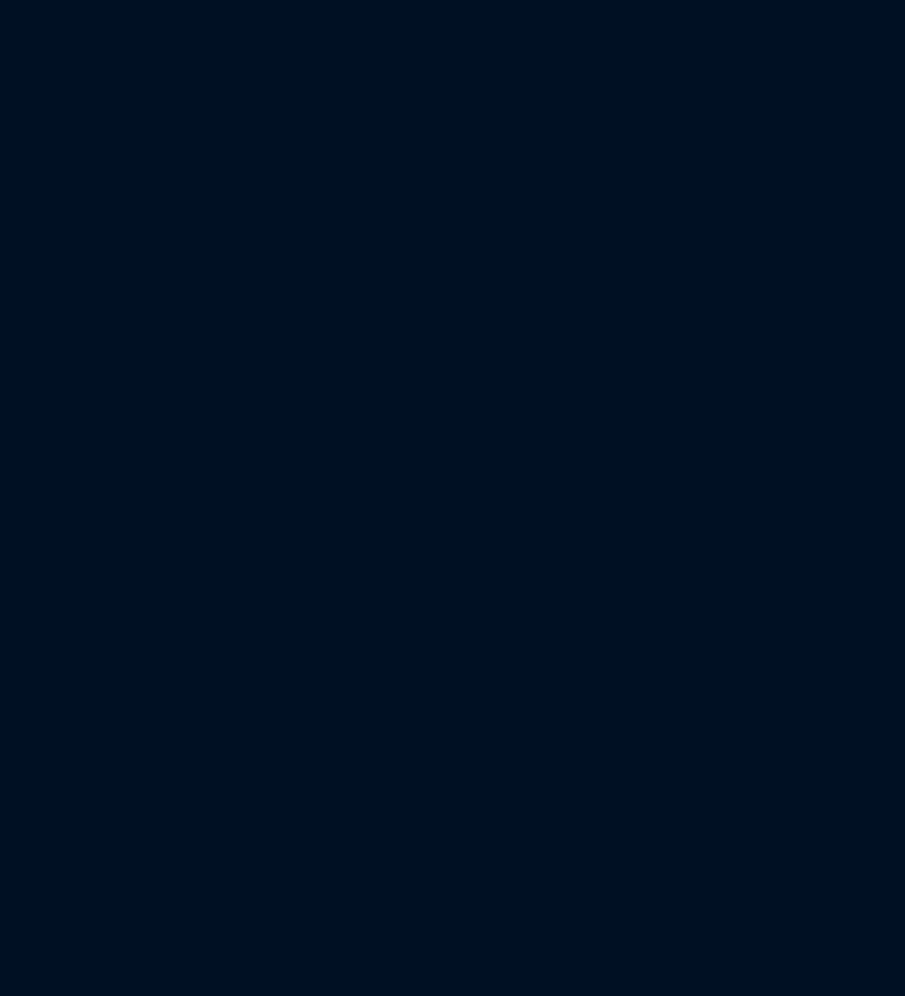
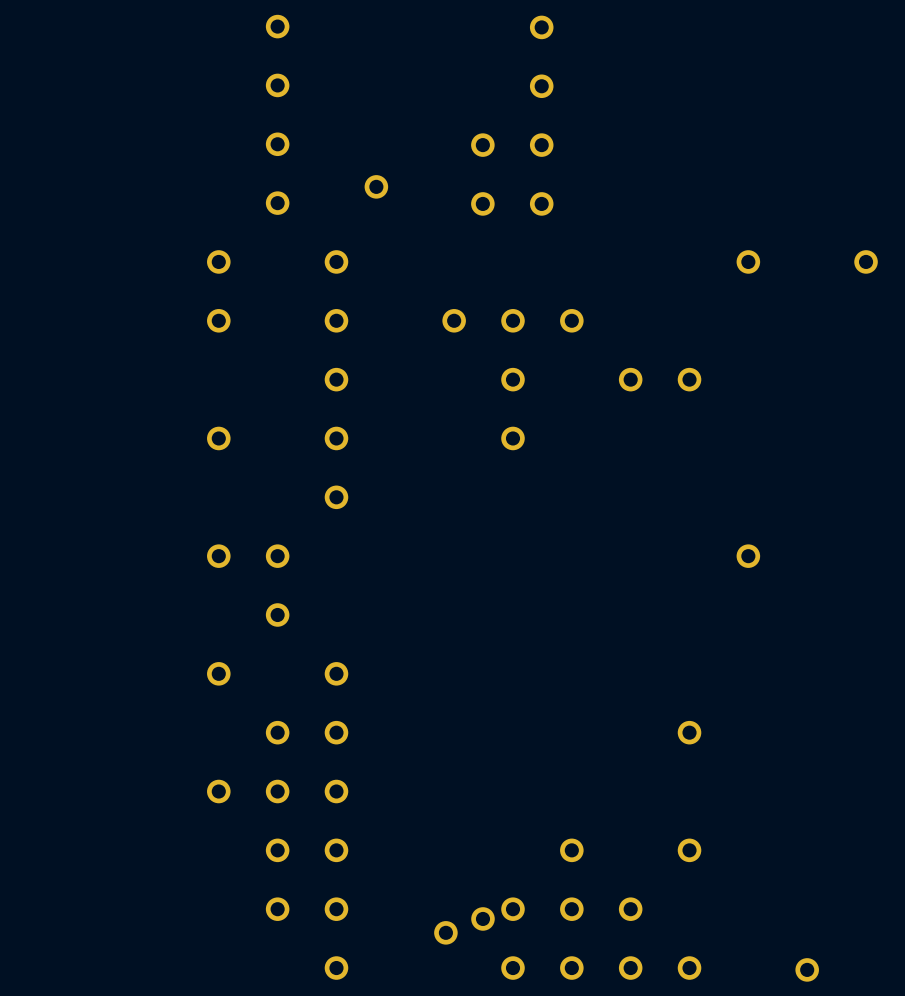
part: none -> (277, 26)
part: none -> (541, 27)
part: none -> (277, 85)
part: none -> (541, 86)
part: none -> (277, 144)
part: none -> (482, 145)
part: none -> (541, 145)
part: none -> (376, 186)
part: none -> (277, 203)
part: none -> (482, 203)
part: none -> (541, 203)
part: none -> (218, 261)
part: none -> (336, 261)
part: none -> (748, 261)
part: none -> (866, 261)
part: none -> (218, 320)
part: none -> (336, 320)
part: none -> (454, 320)
part: none -> (512, 320)
part: none -> (571, 320)
part: none -> (336, 379)
part: none -> (512, 379)
part: none -> (630, 379)
part: none -> (689, 379)
part: none -> (218, 438)
part: none -> (336, 438)
part: none -> (512, 438)
part: none -> (336, 497)
part: none -> (218, 556)
part: none -> (277, 556)
part: none -> (748, 556)
part: none -> (277, 614)
part: none -> (218, 673)
part: none -> (336, 673)
part: none -> (277, 732)
part: none -> (336, 732)
part: none -> (689, 732)
part: none -> (218, 791)
part: none -> (277, 791)
part: none -> (336, 791)
part: none -> (277, 850)
part: none -> (336, 850)
part: none -> (571, 850)
part: none -> (689, 850)
part: none -> (277, 909)
part: none -> (336, 909)
part: none -> (512, 909)
part: none -> (571, 909)
part: none -> (630, 909)
part: none -> (482, 918)
part: none -> (445, 932)
part: none -> (336, 968)
part: none -> (512, 968)
part: none -> (571, 968)
part: none -> (630, 968)
part: none -> (689, 968)
part: none -> (807, 969)

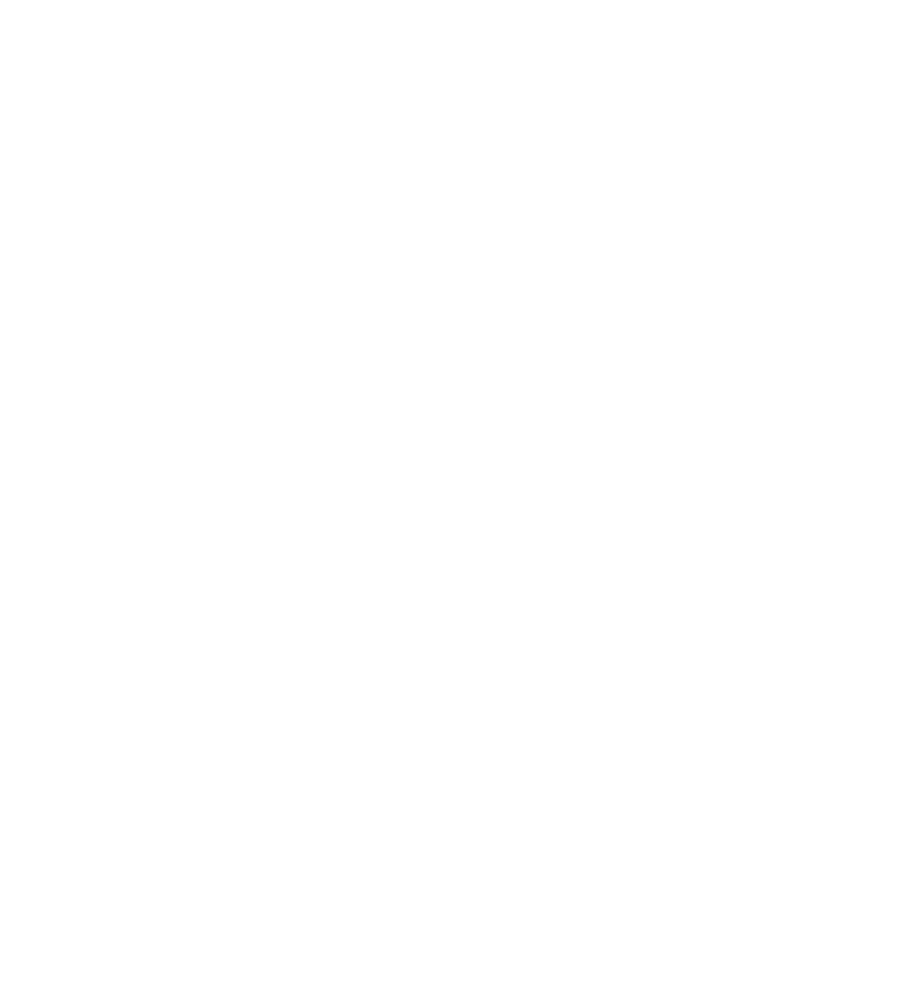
part: (277, 26) -> none
part: (541, 27) -> none
part: (277, 85) -> none
part: (541, 86) -> none
part: (277, 144) -> none
part: (482, 145) -> none
part: (541, 145) -> none
part: (376, 186) -> none
part: (277, 203) -> none
part: (482, 203) -> none
part: (541, 203) -> none
part: (218, 261) -> none
part: (336, 261) -> none
part: (748, 261) -> none
part: (866, 261) -> none
part: (218, 320) -> none
part: (336, 320) -> none
part: (454, 320) -> none
part: (512, 320) -> none
part: (571, 320) -> none
part: (336, 379) -> none
part: (512, 379) -> none
part: (630, 379) -> none
part: (689, 379) -> none
part: (218, 438) -> none
part: (336, 438) -> none
part: (512, 438) -> none
part: (336, 497) -> none
part: (218, 556) -> none
part: (277, 556) -> none
part: (748, 556) -> none
part: (277, 614) -> none
part: (218, 673) -> none
part: (336, 673) -> none
part: (277, 732) -> none
part: (336, 732) -> none
part: (689, 732) -> none
part: (218, 791) -> none
part: (277, 791) -> none
part: (336, 791) -> none
part: (277, 850) -> none
part: (336, 850) -> none
part: (571, 850) -> none
part: (689, 850) -> none
part: (277, 909) -> none
part: (336, 909) -> none
part: (512, 909) -> none
part: (571, 909) -> none
part: (630, 909) -> none
part: (482, 918) -> none
part: (445, 932) -> none
part: (336, 968) -> none
part: (512, 968) -> none
part: (571, 968) -> none
part: (630, 968) -> none
part: (689, 968) -> none
part: (807, 969) -> none

